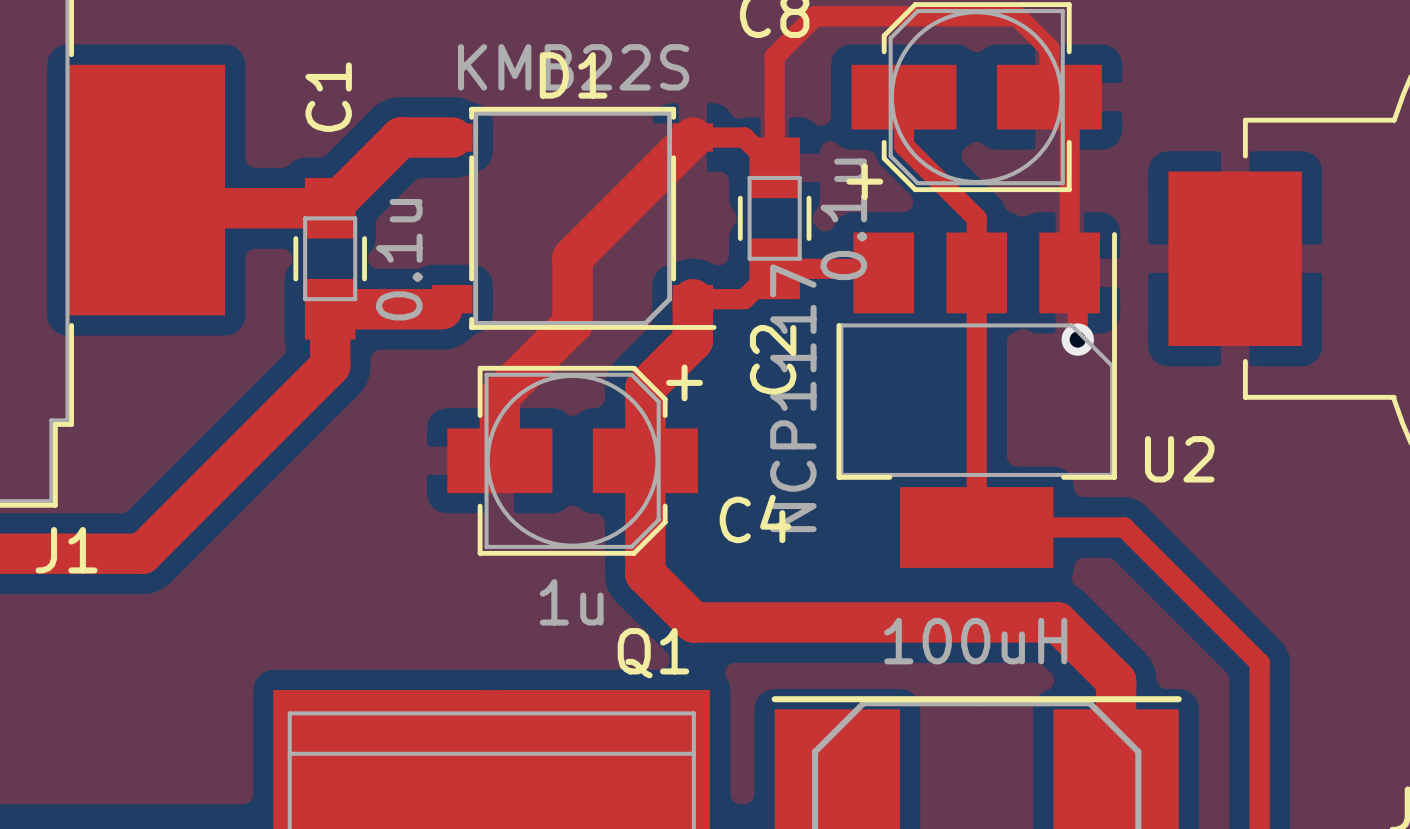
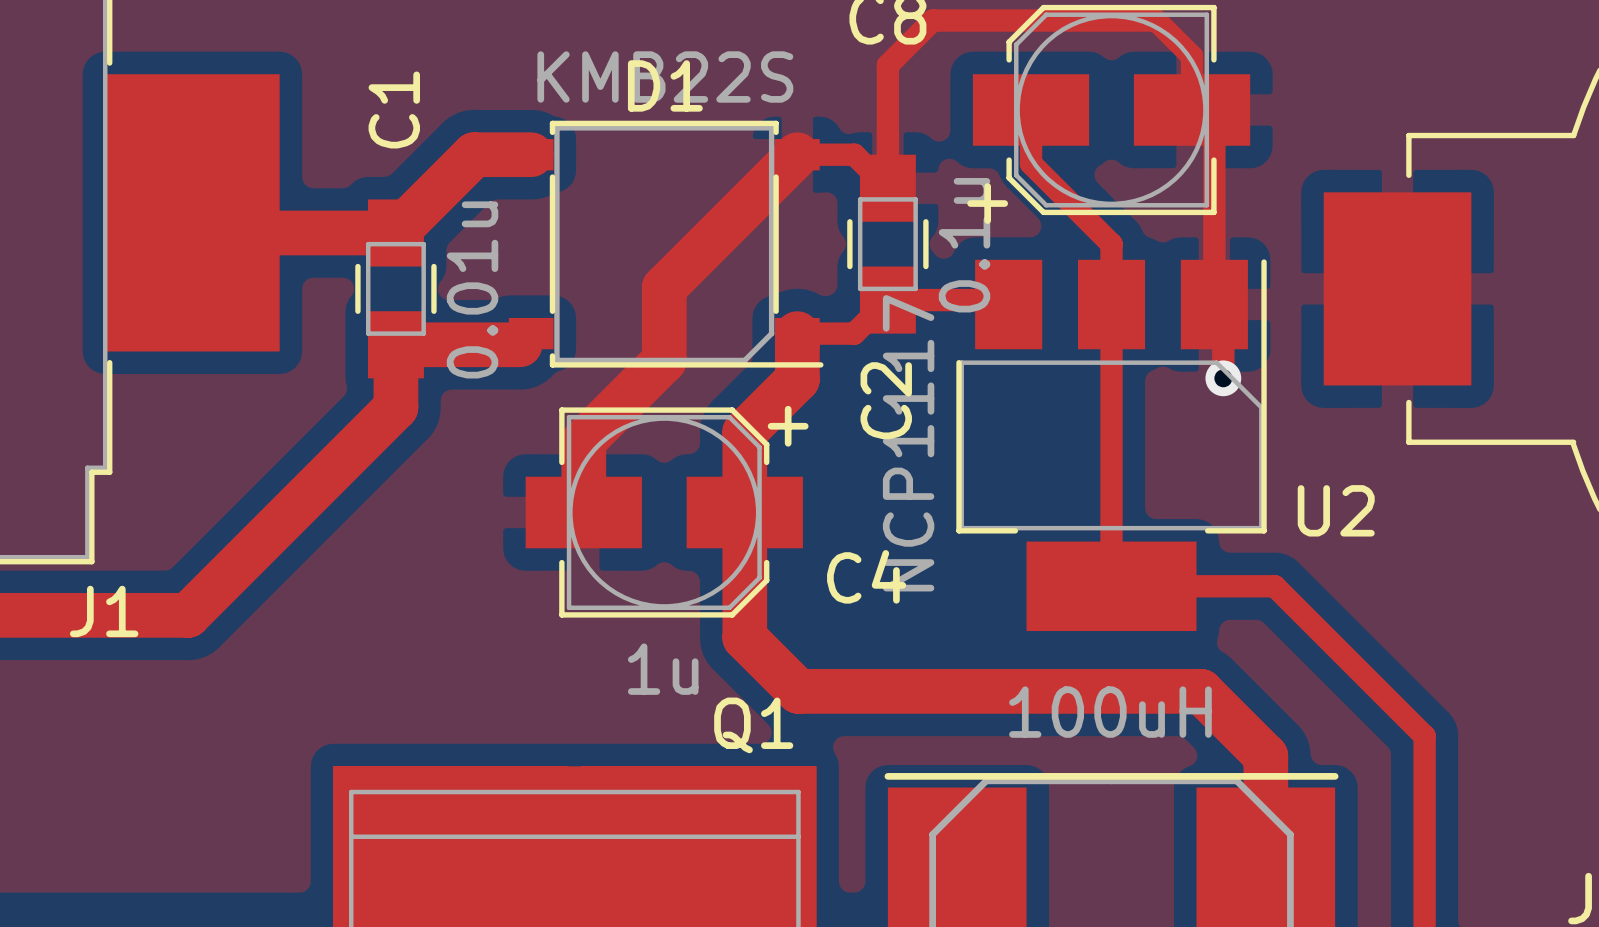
C1 value: 0.1u (399, 259) -> 0.01u (472, 289)

